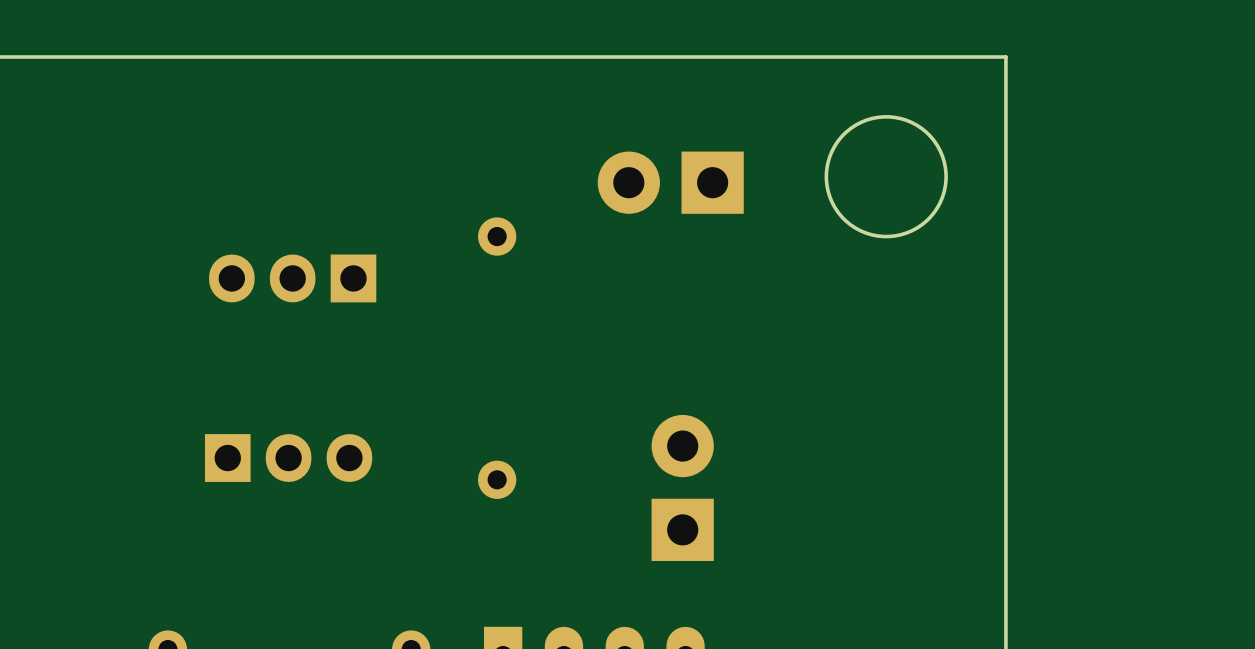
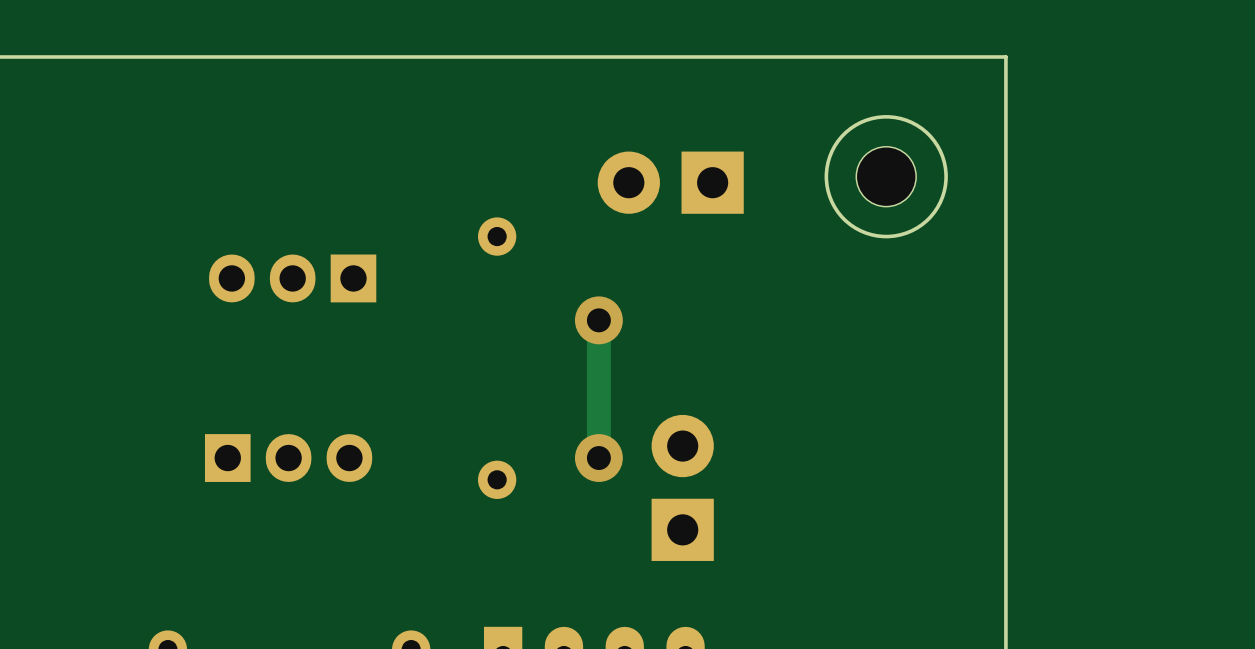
part: none -> (886, 176)
track: none -> (598, 320) (598, 458)
via: none -> (598, 320)
via: none -> (598, 458)

